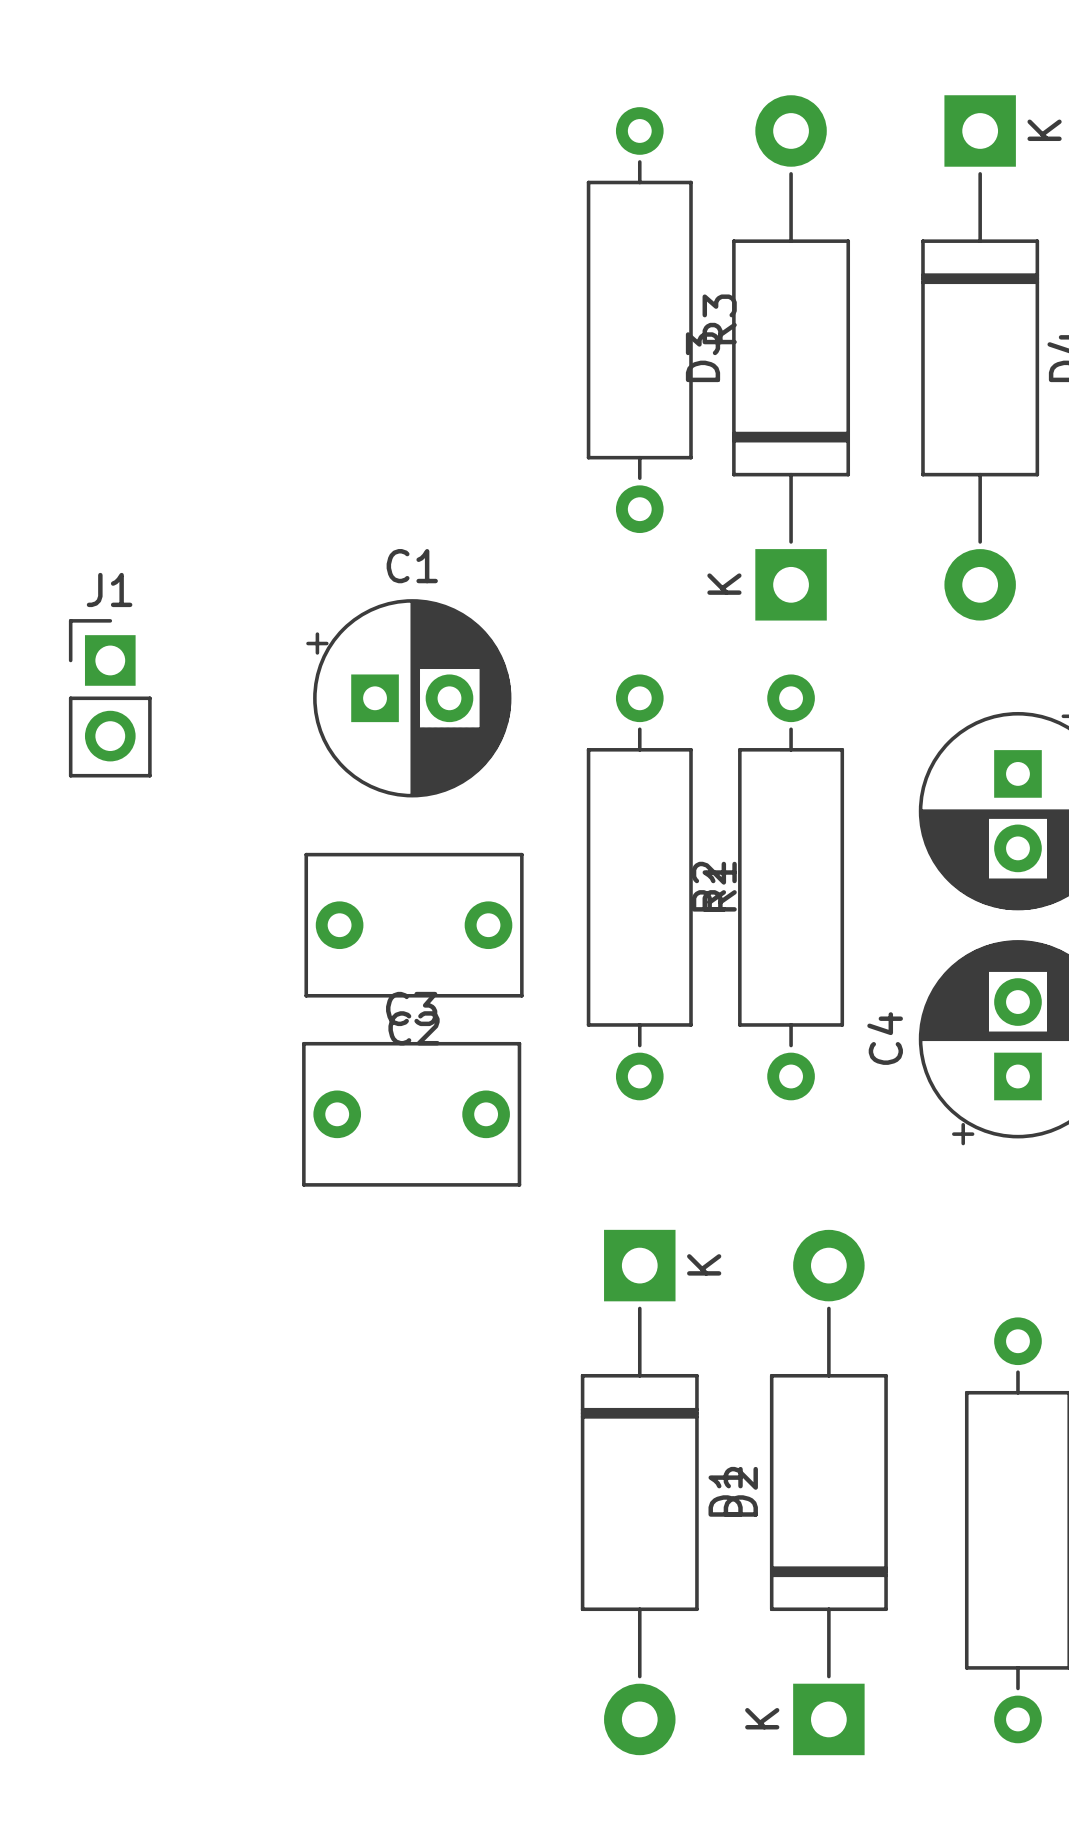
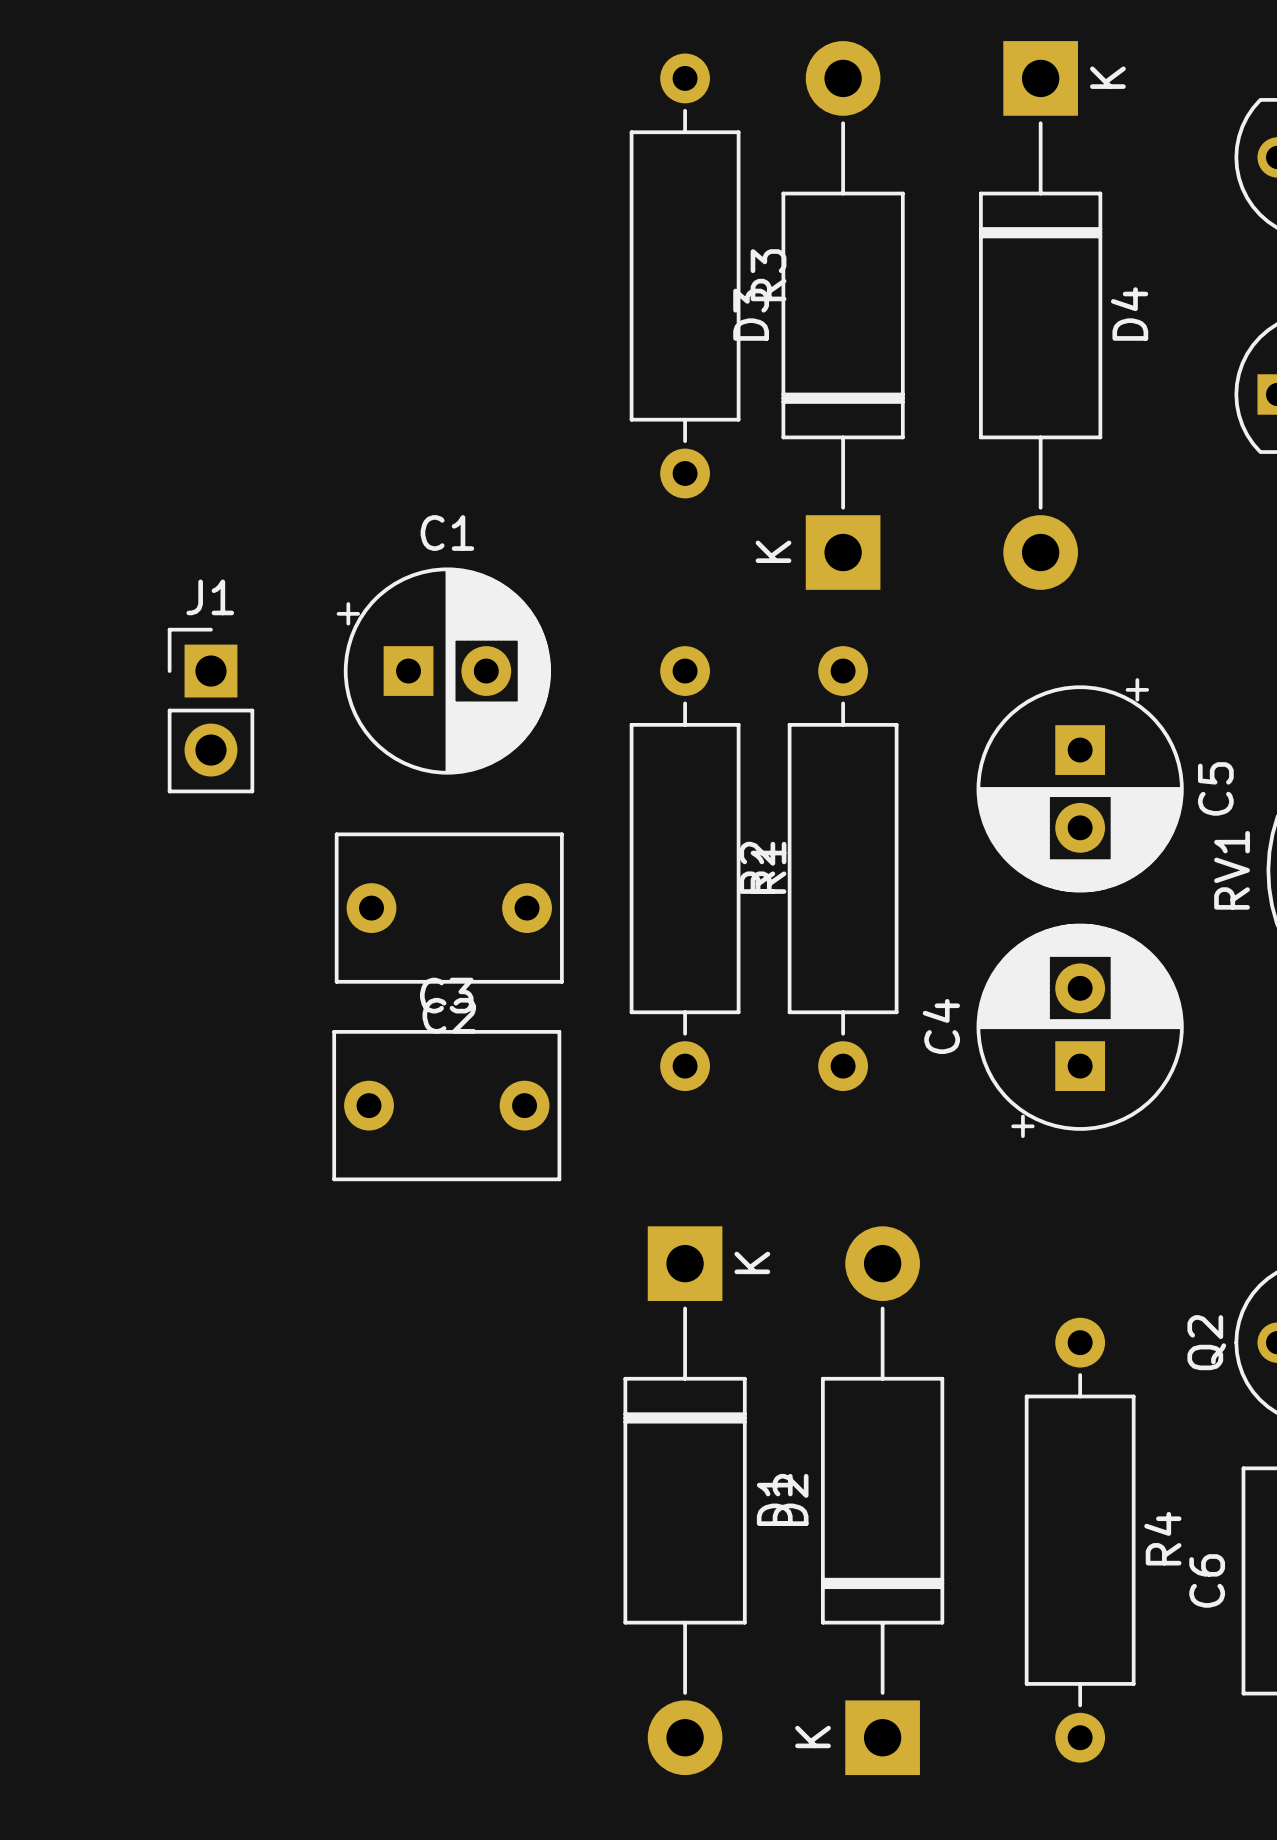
J1 position: (110, 698) -> (210, 710)

